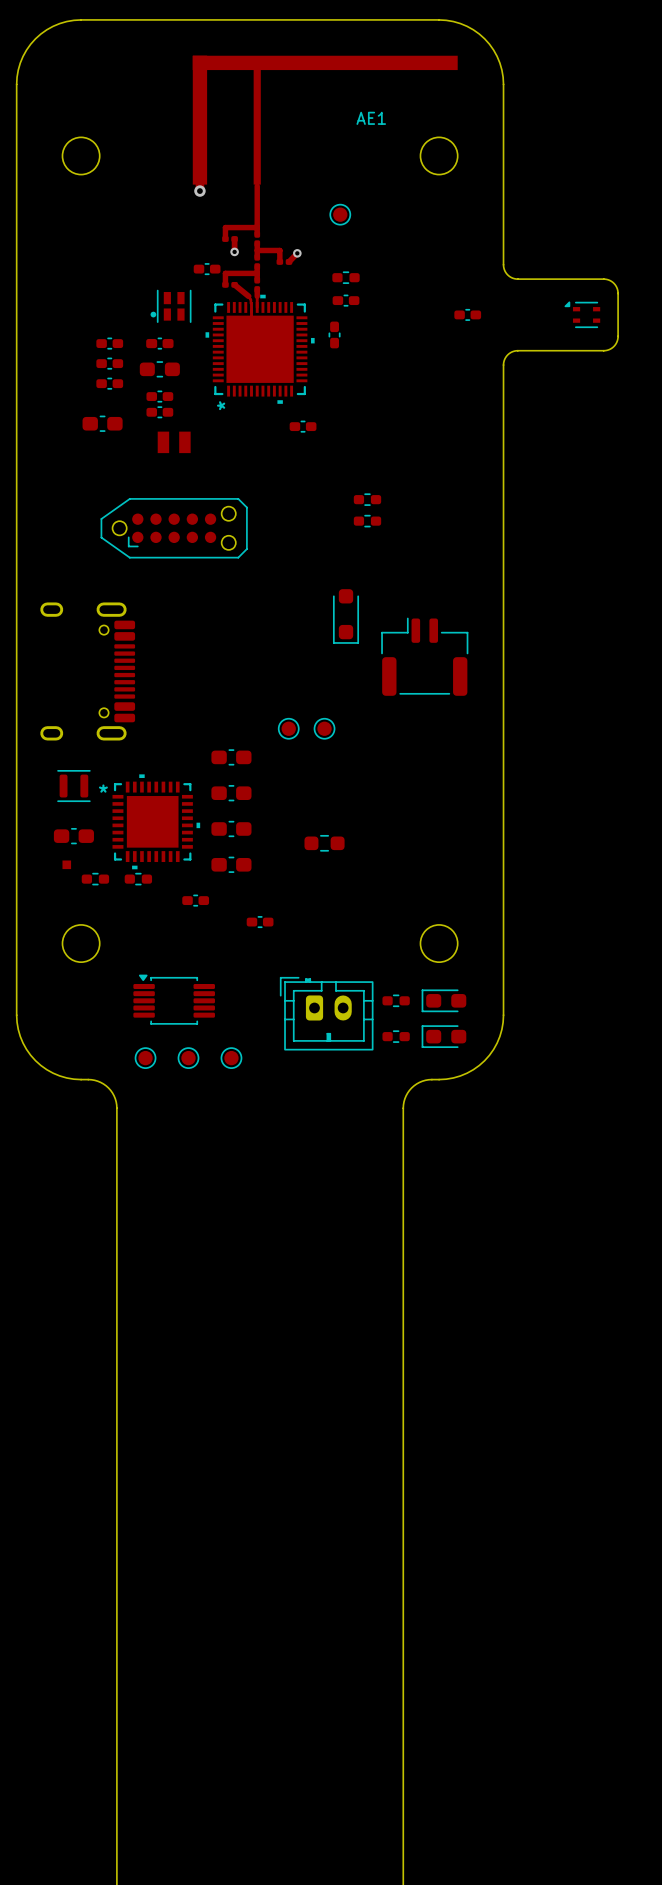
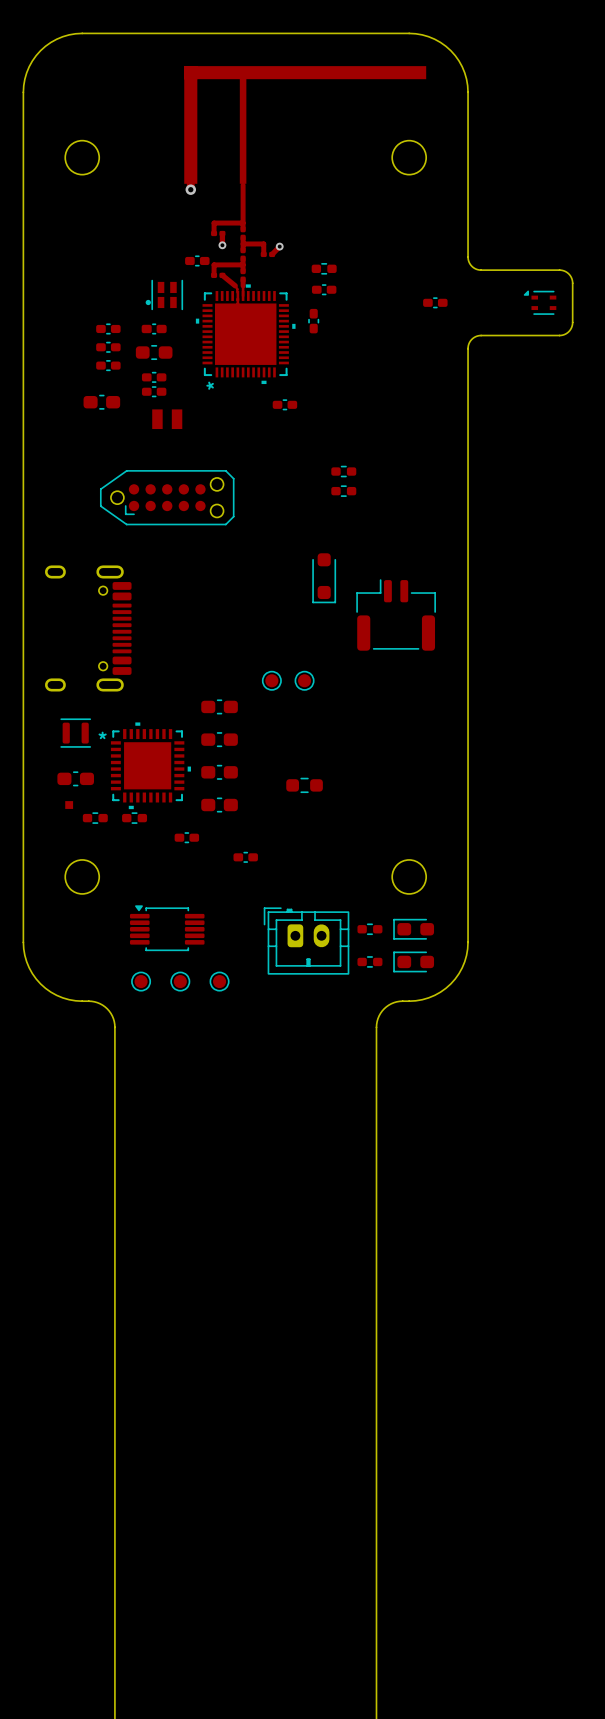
AE1 name: AE1 (371, 118) -> none
part: (340, 214) -> none

